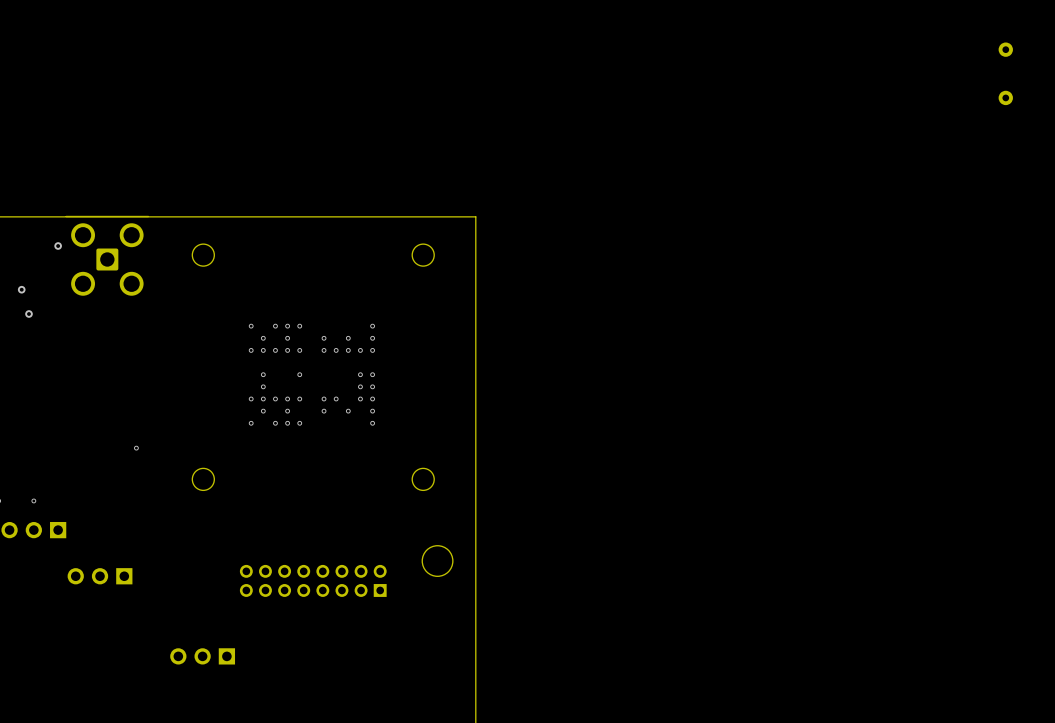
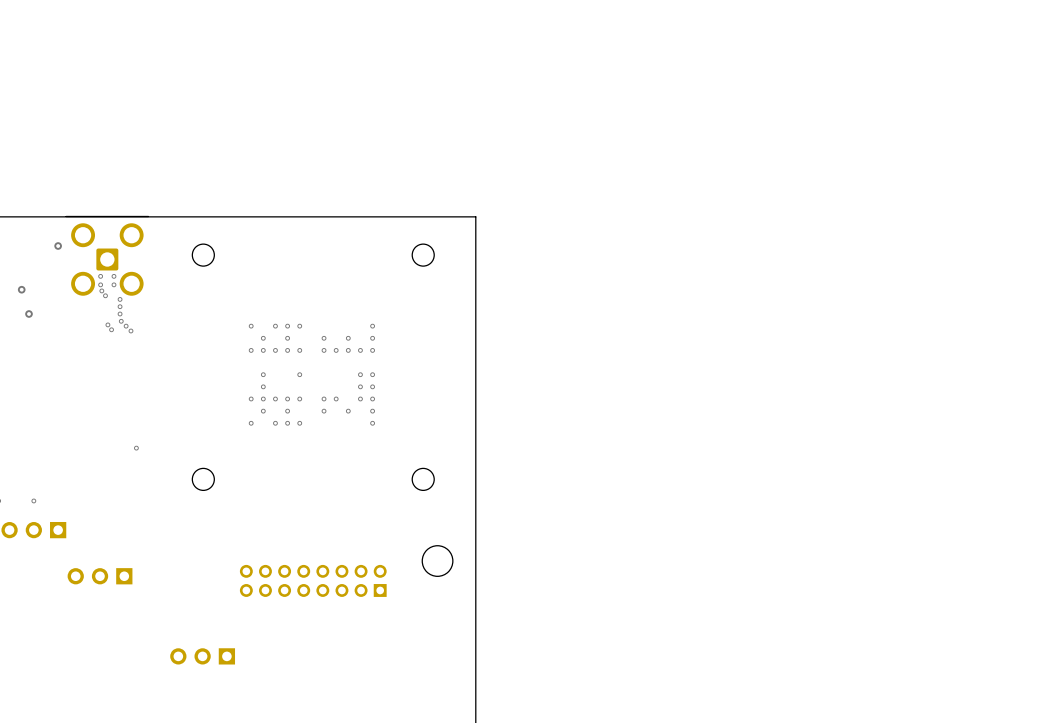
part: (1005, 49) -> none
part: (1005, 97) -> none
via: none -> (100, 276)
via: none -> (113, 276)
via: none -> (100, 284)
via: none -> (113, 284)
via: none -> (101, 290)
via: none -> (105, 295)
via: none -> (120, 299)
via: none -> (120, 306)
via: none -> (120, 314)
via: none -> (121, 321)
via: none -> (107, 324)
via: none -> (126, 326)
via: none -> (111, 329)
via: none -> (130, 330)

